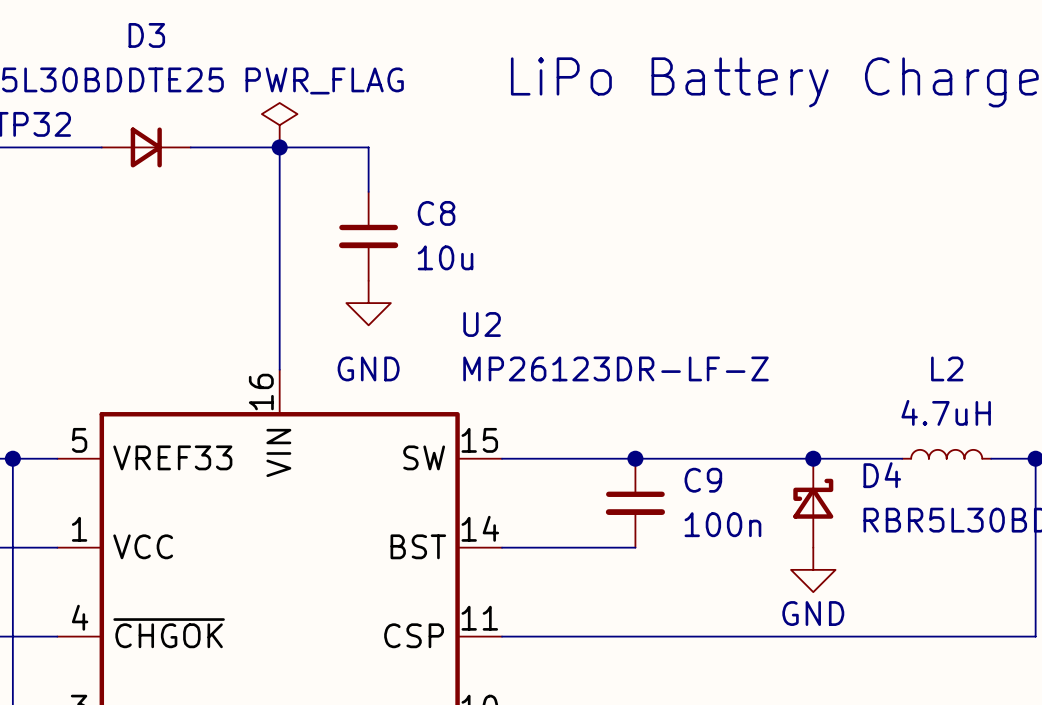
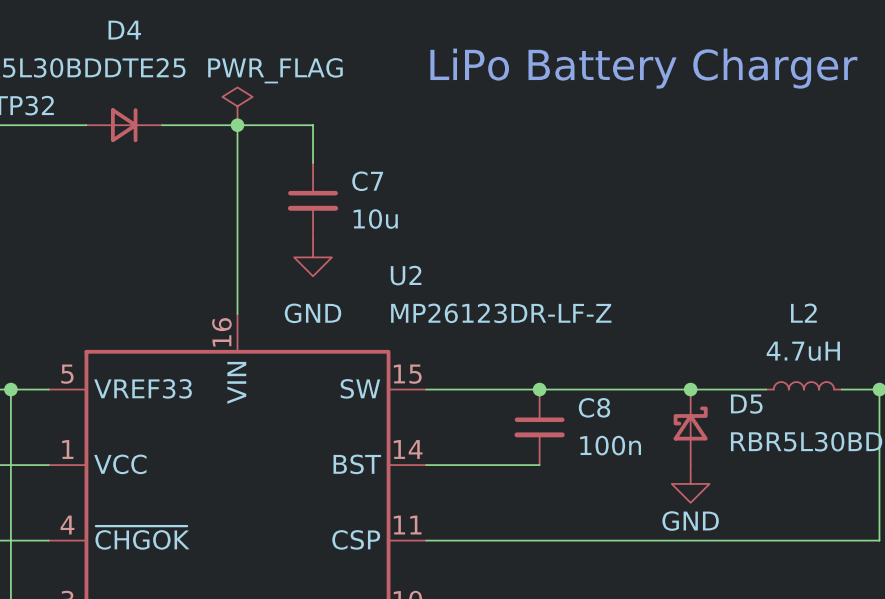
D3 name: D3 (146, 35) -> D4 (124, 30)
C8 name: C8 (436, 213) -> C7 (367, 181)
D4 name: D4 (882, 475) -> D5 (746, 404)
C9 name: C9 (703, 480) -> C8 (594, 407)

